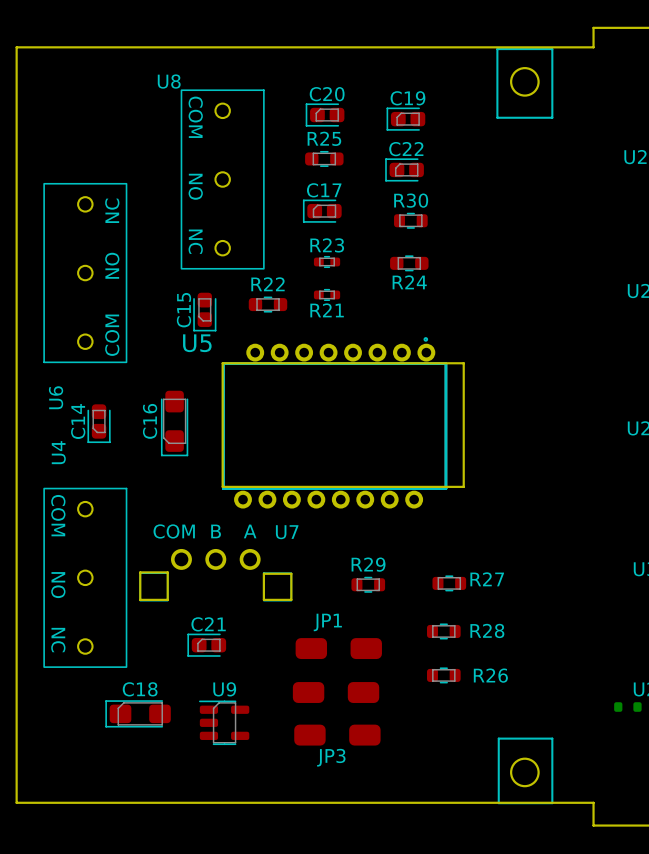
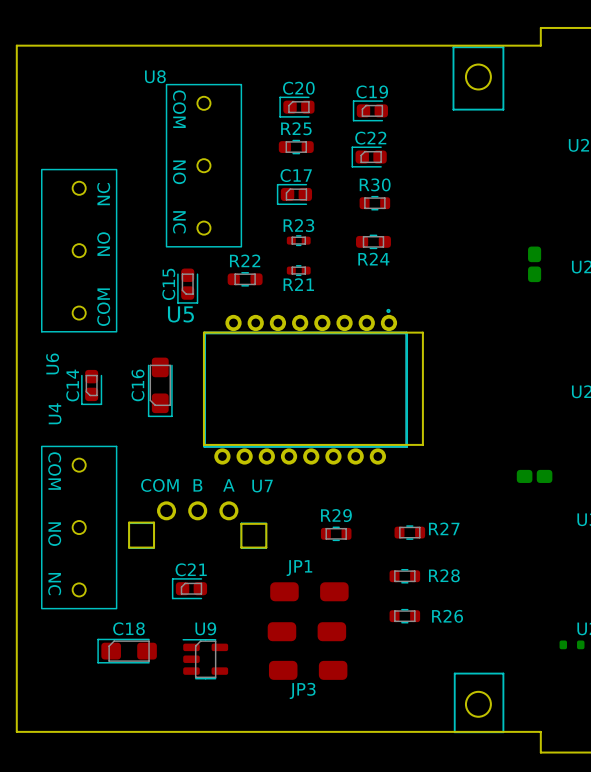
part: none -> (534, 264)
part: none -> (534, 476)

